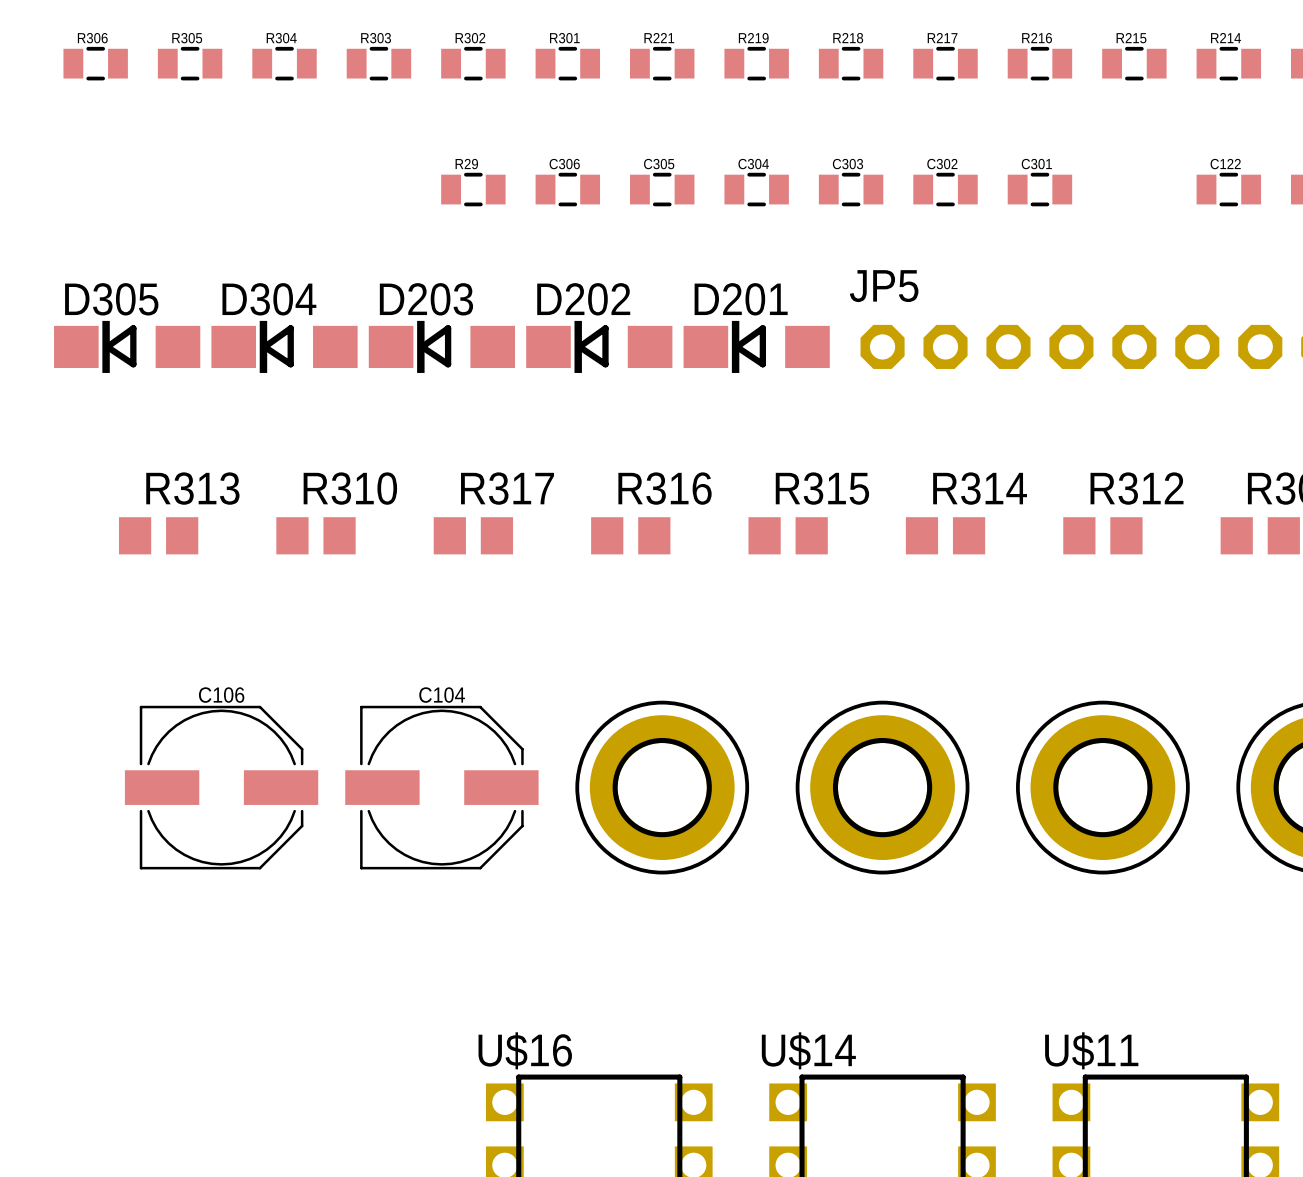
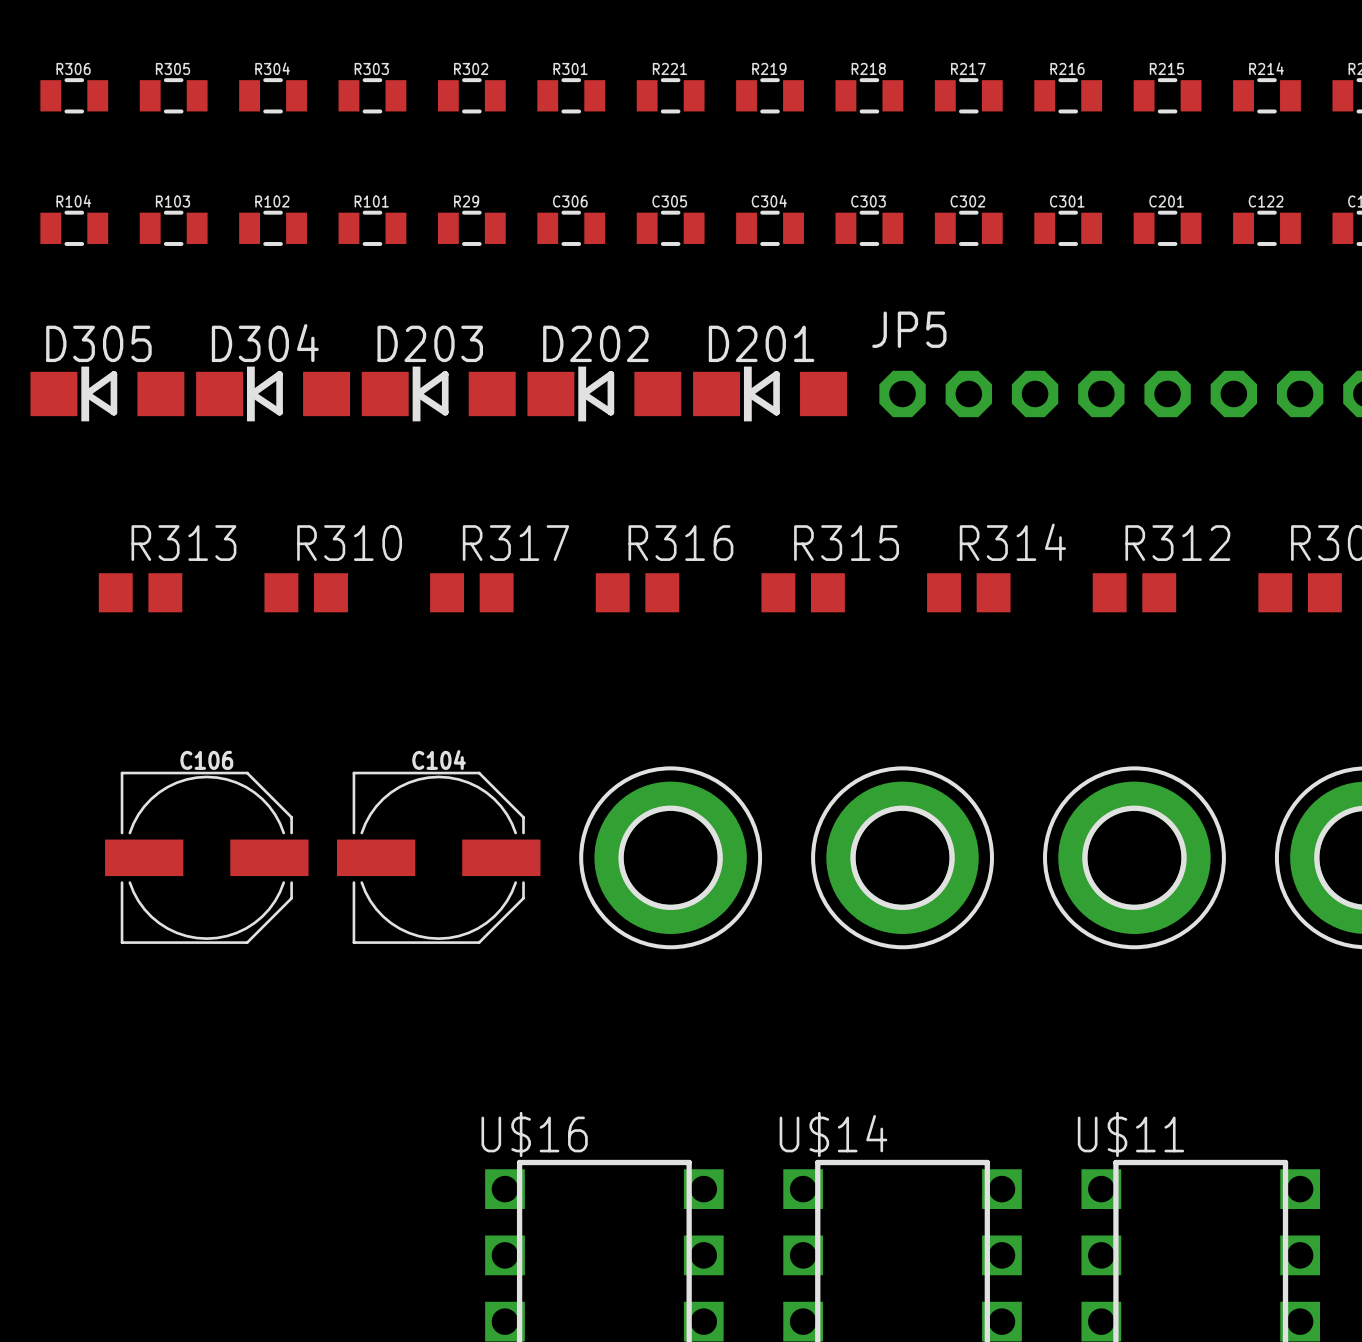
R104: none -> (74, 228)
R103: none -> (173, 228)
R102: none -> (273, 228)
R101: none -> (372, 228)
C201: none -> (1167, 228)

